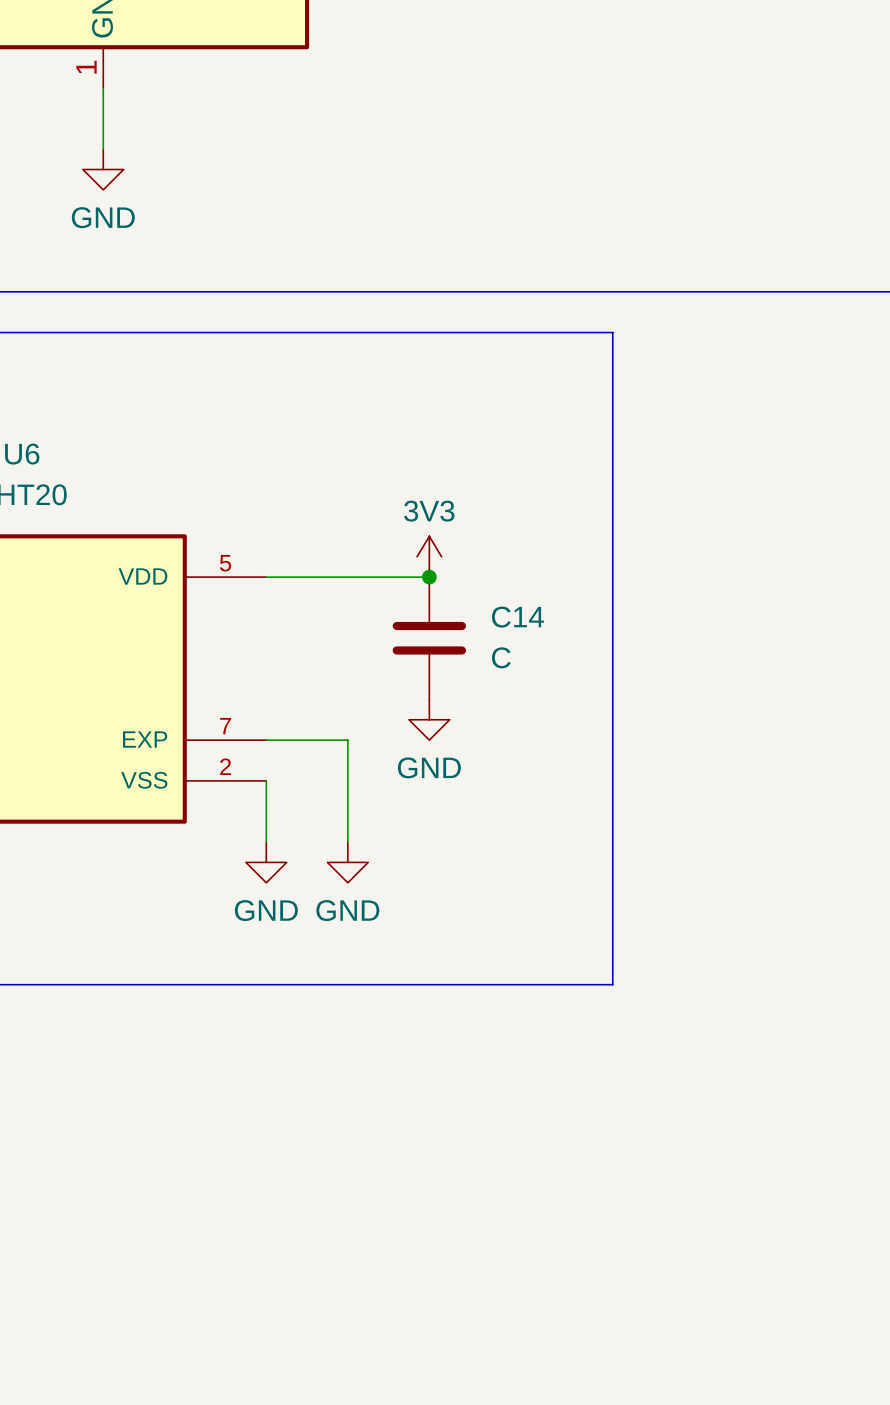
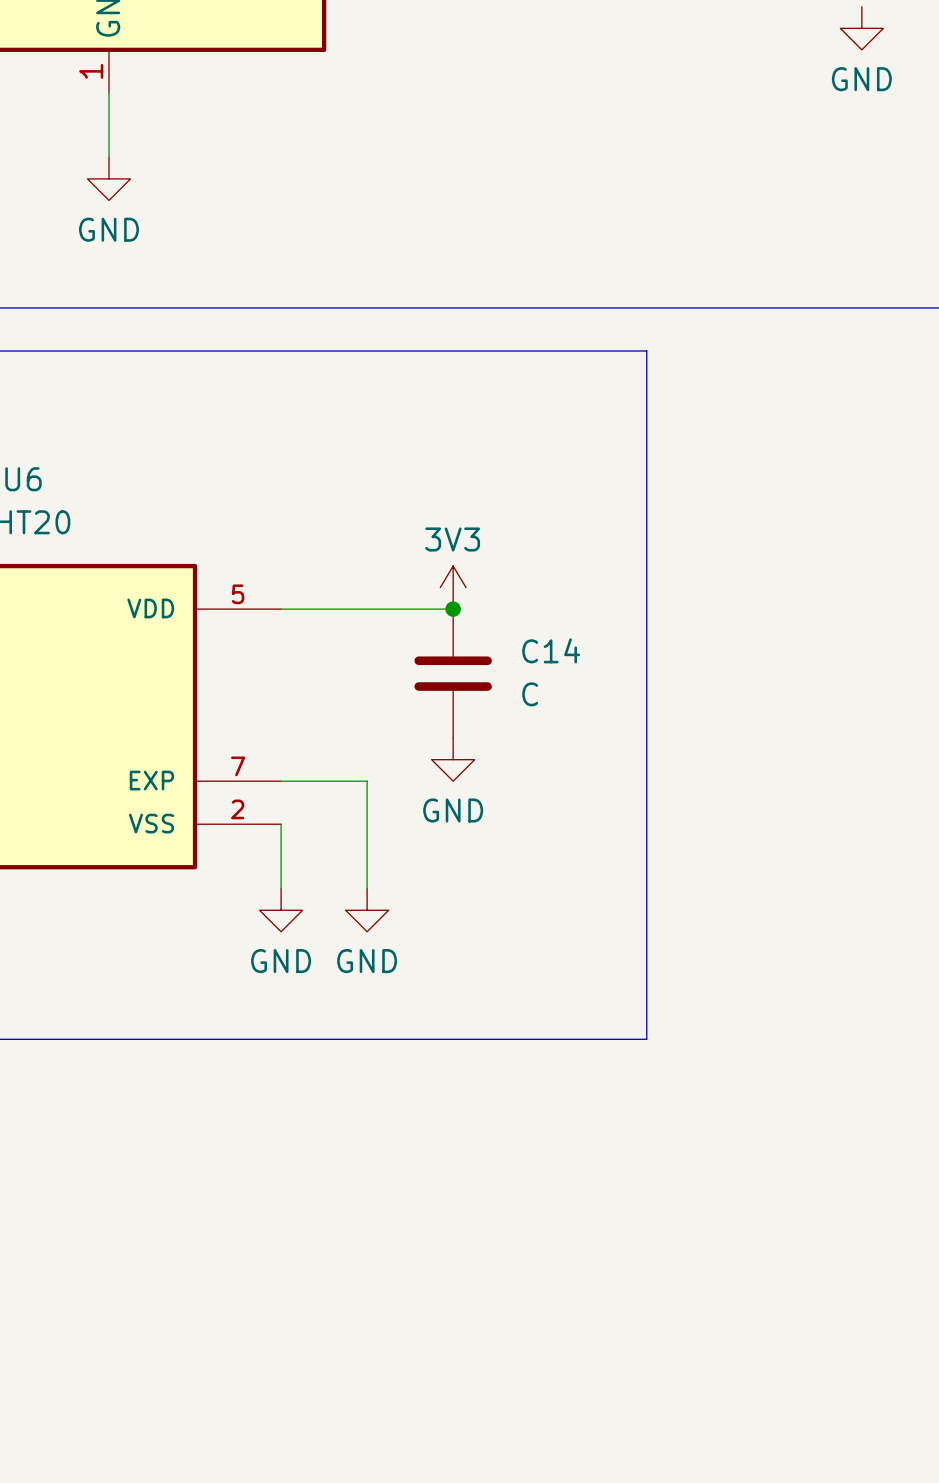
power symbol: none -> GND (861, 28)

